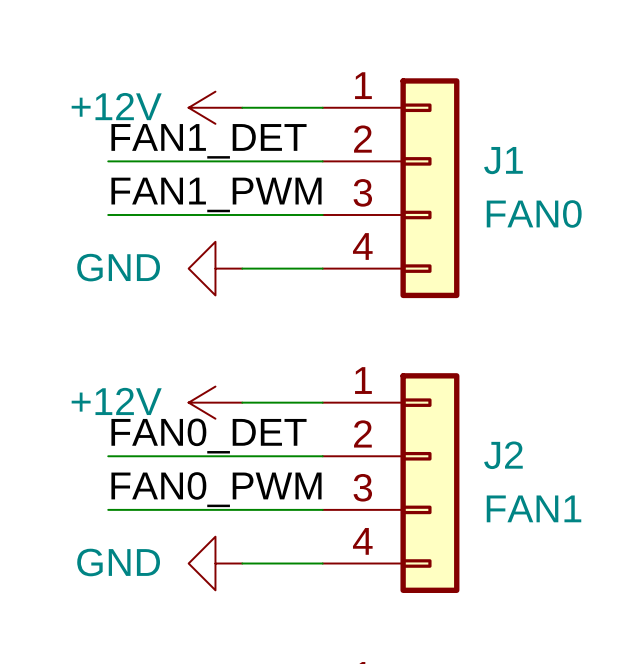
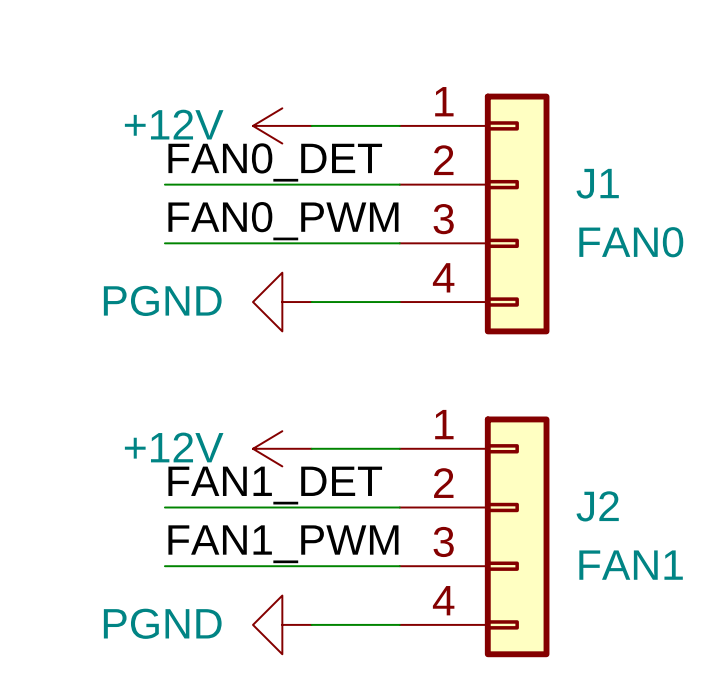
label: FAN1_DET (208, 141) -> FAN0_DET (275, 162)
label: FAN1_PWM (216, 194) -> FAN0_PWM (283, 221)
power symbol: GND (215, 268) -> PGND (282, 302)
label: FAN0_DET (208, 436) -> FAN1_DET (275, 485)
label: FAN0_PWM (216, 489) -> FAN1_PWM (283, 544)
power symbol: GND (215, 563) -> PGND (282, 624)

